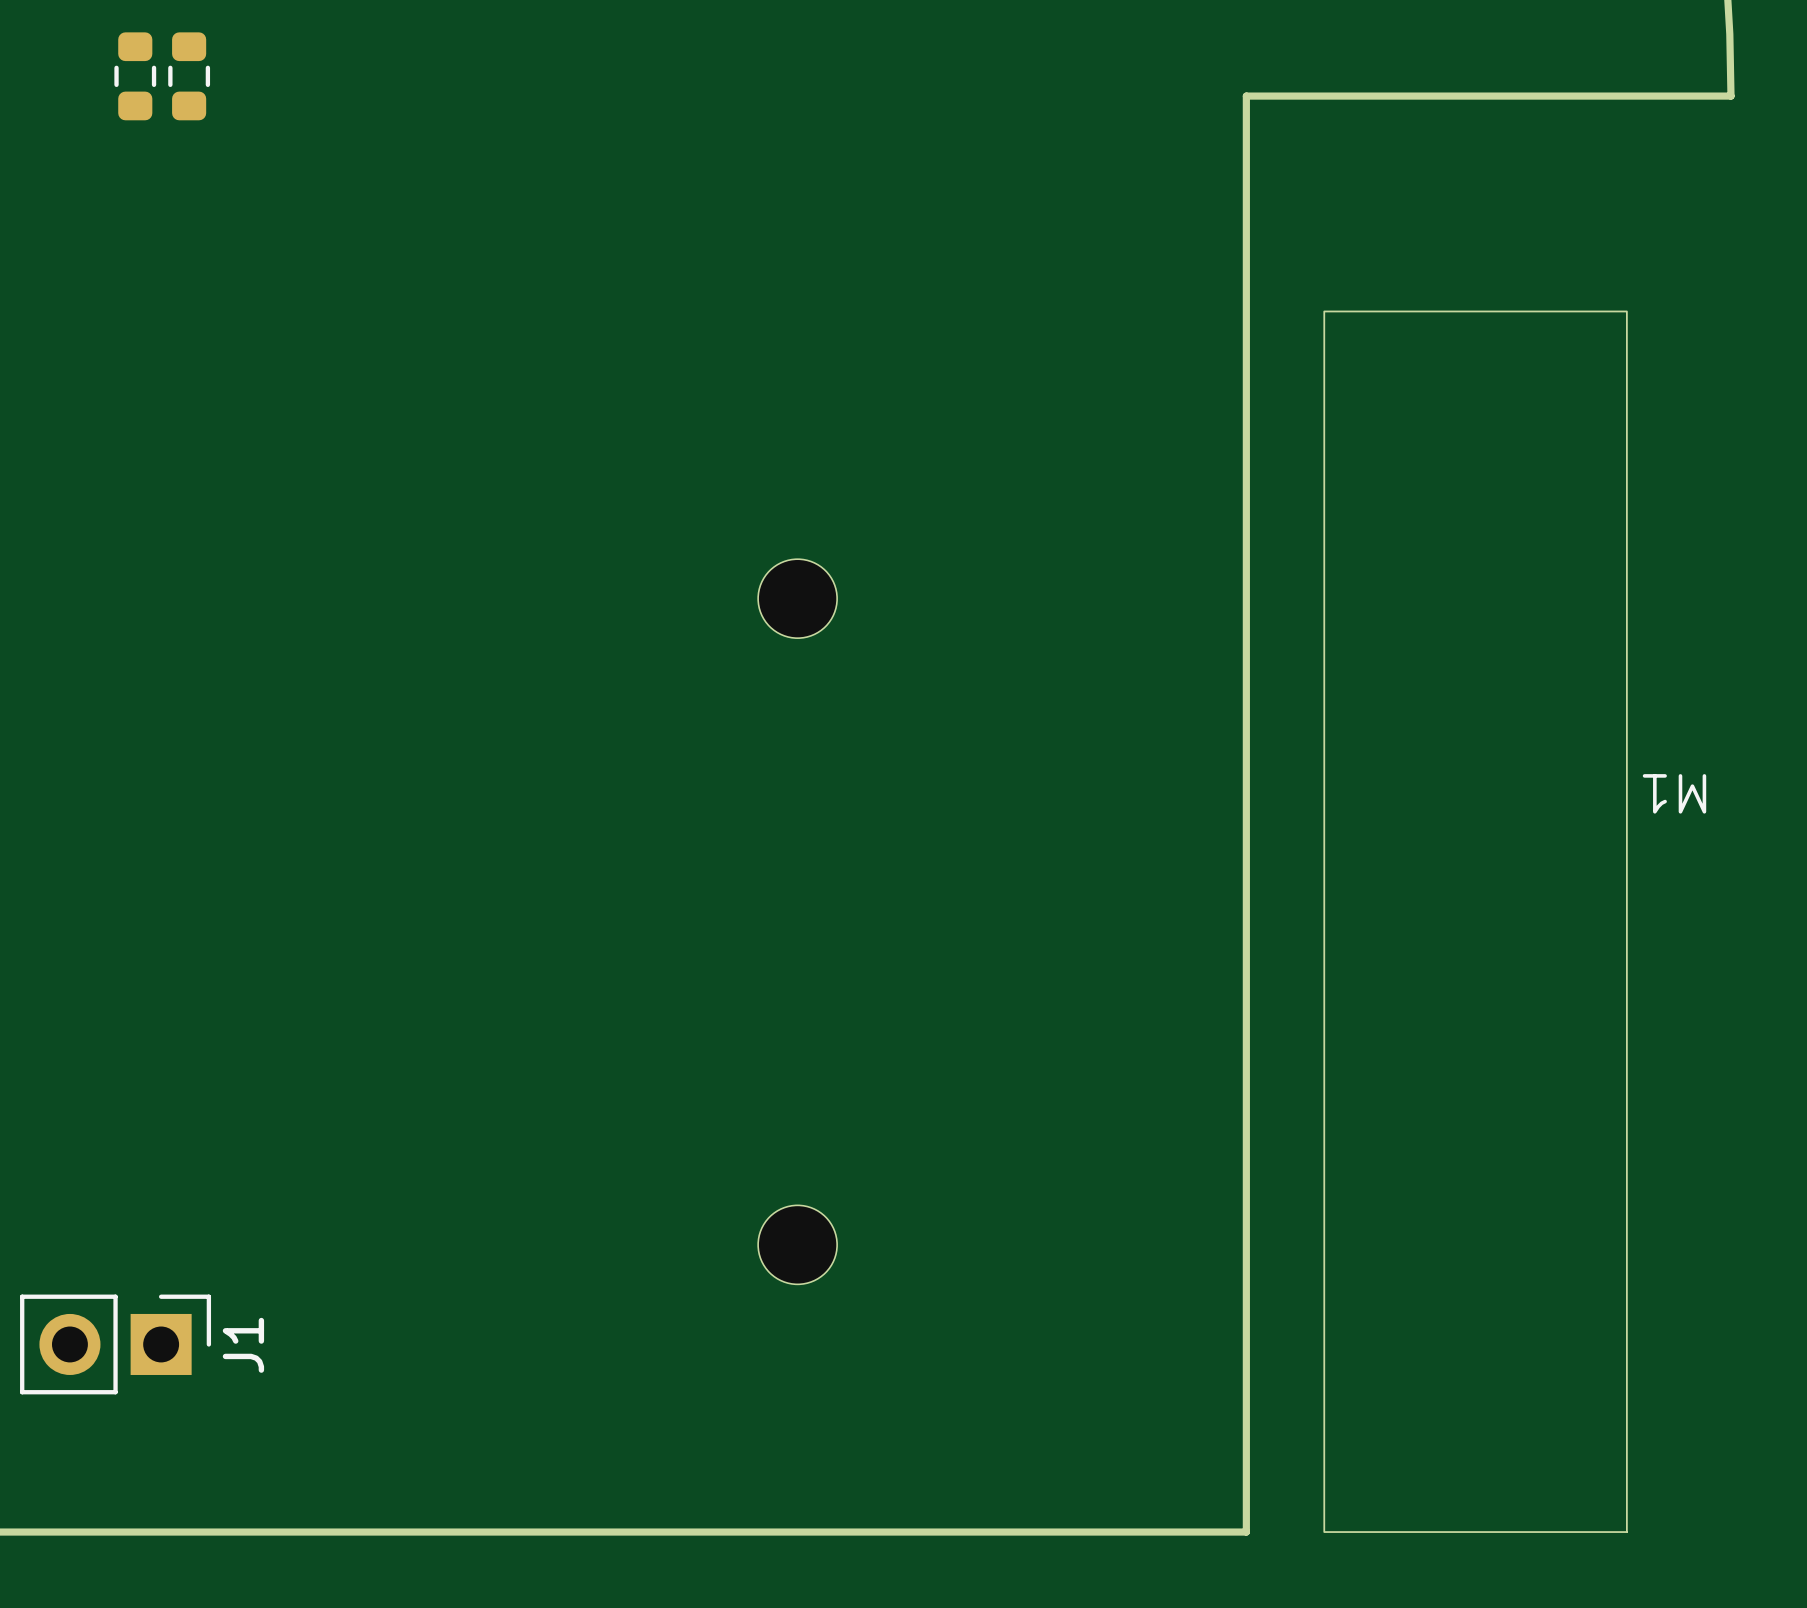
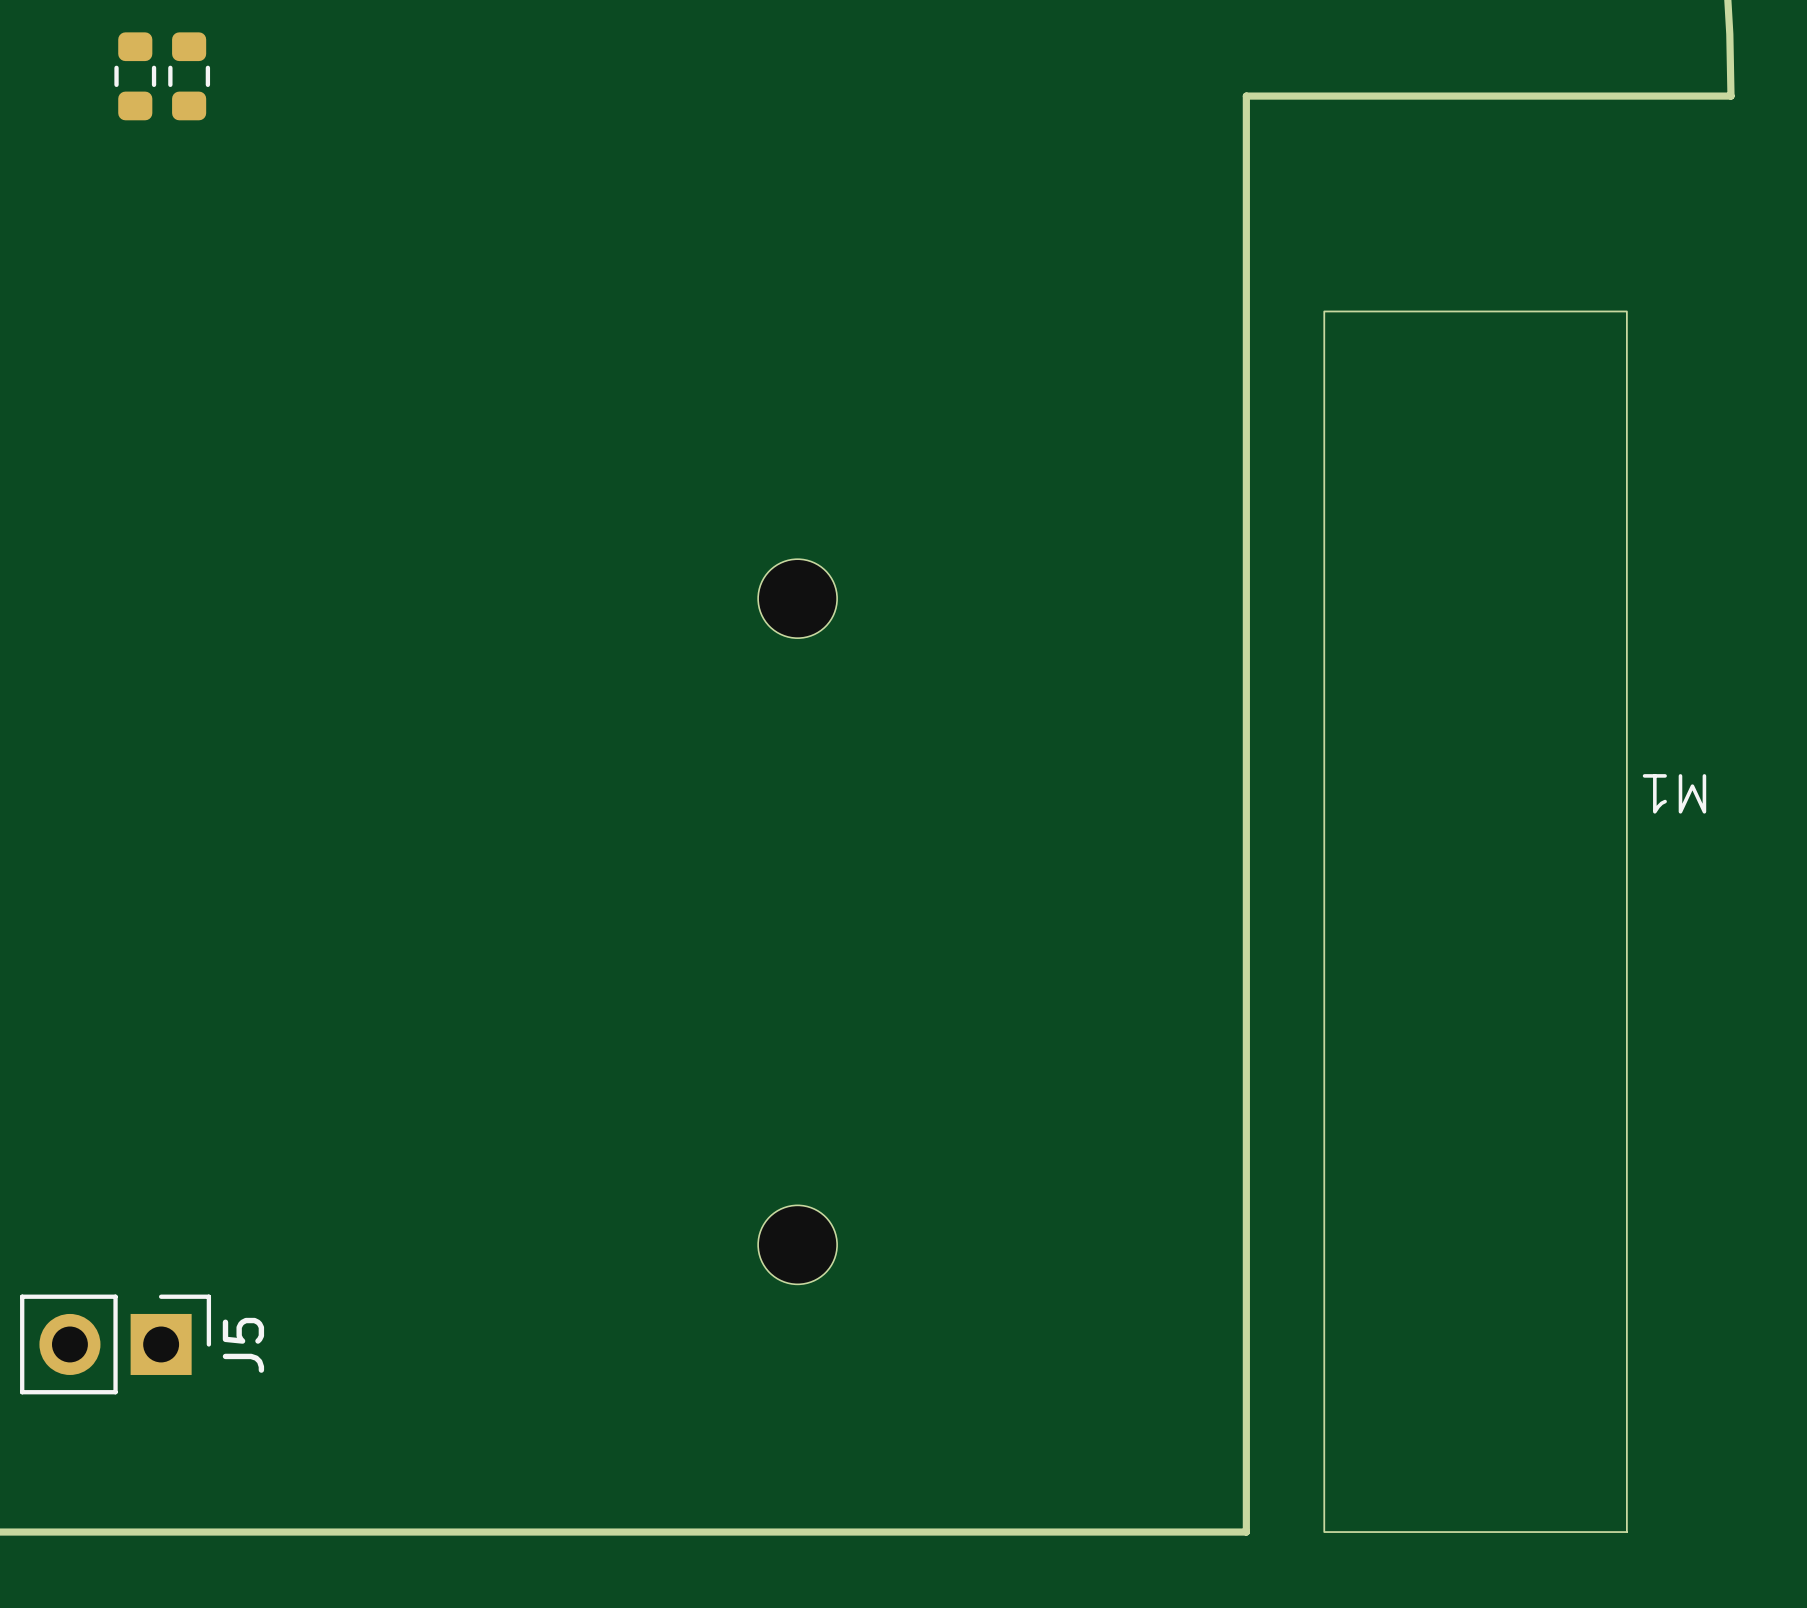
J1 name: J1 (243, 1345) -> J5 (243, 1345)

